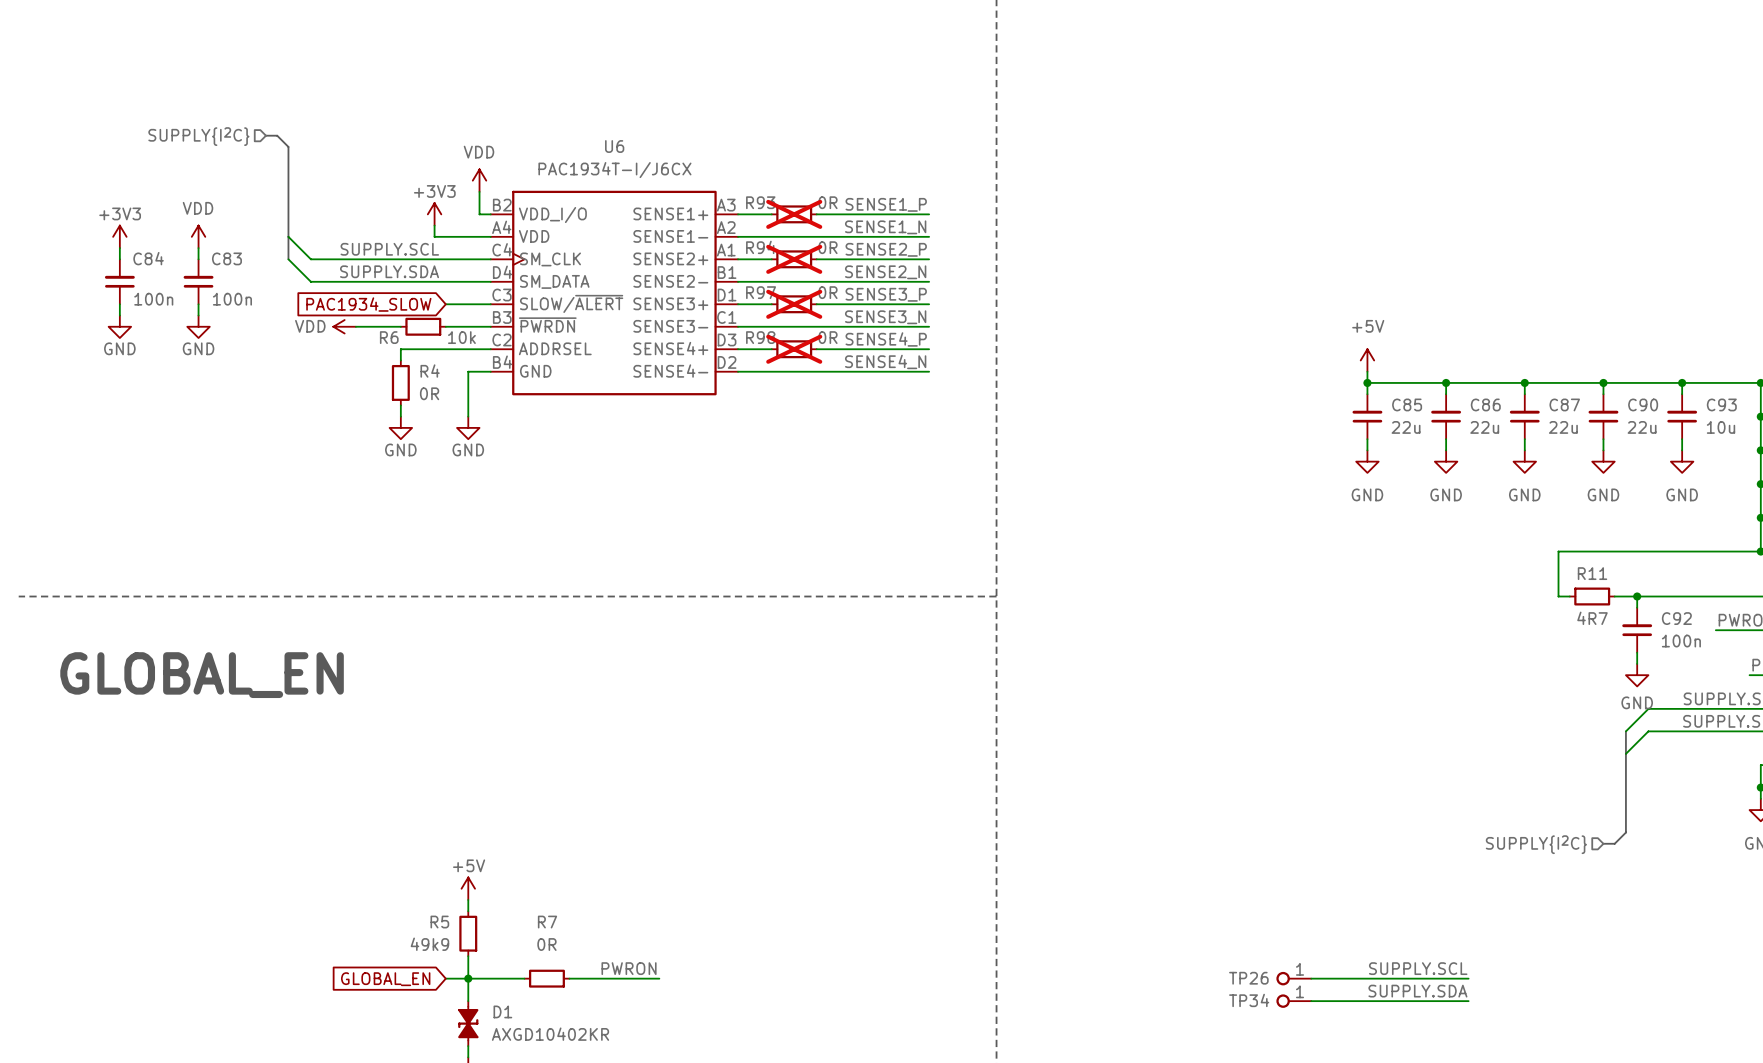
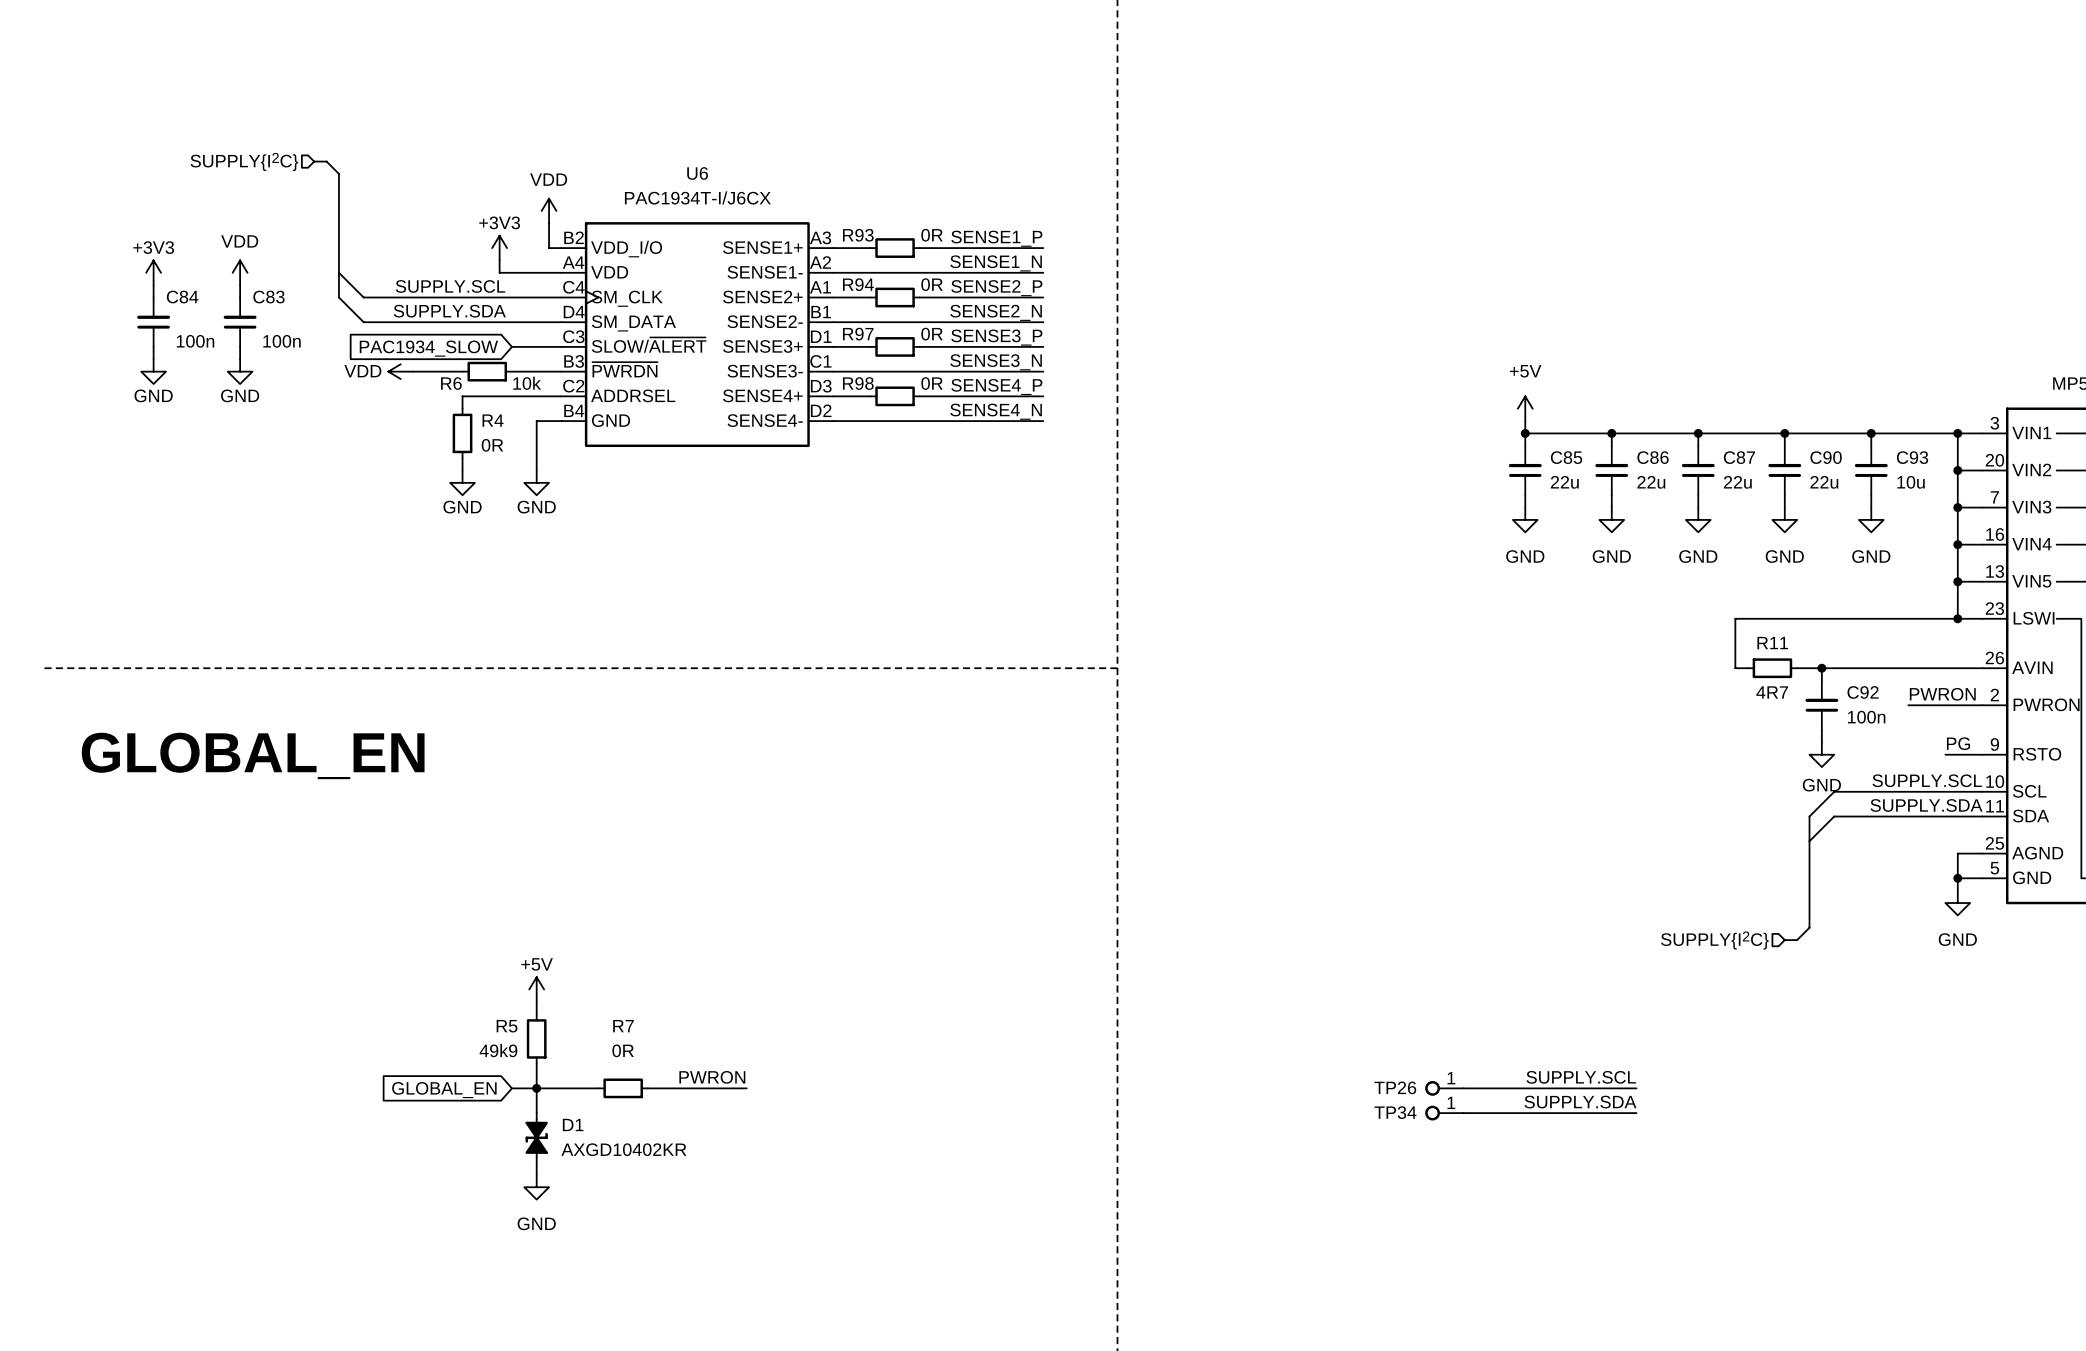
R93 do-not-place cross: (794, 214) -> none
R94 do-not-place cross: (794, 259) -> none
R97 do-not-place cross: (794, 304) -> none
R98 do-not-place cross: (794, 349) -> none

